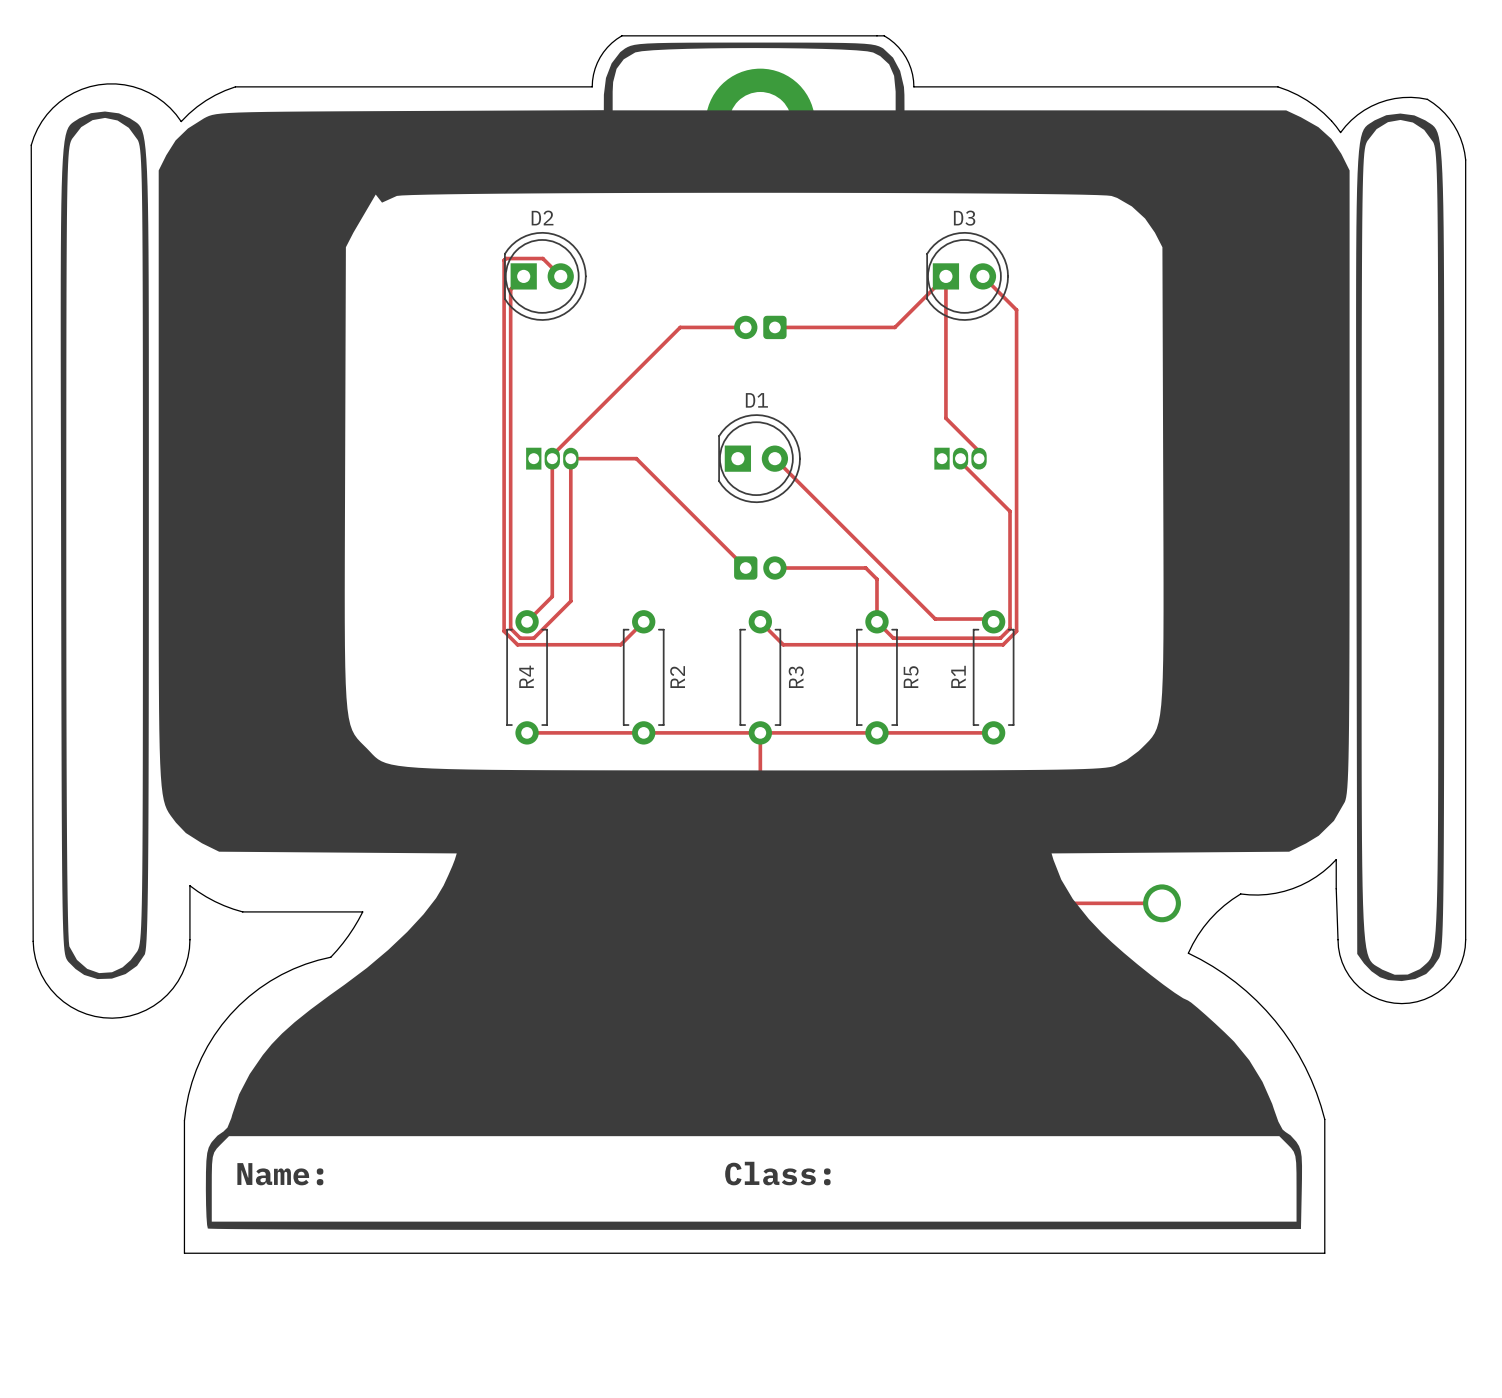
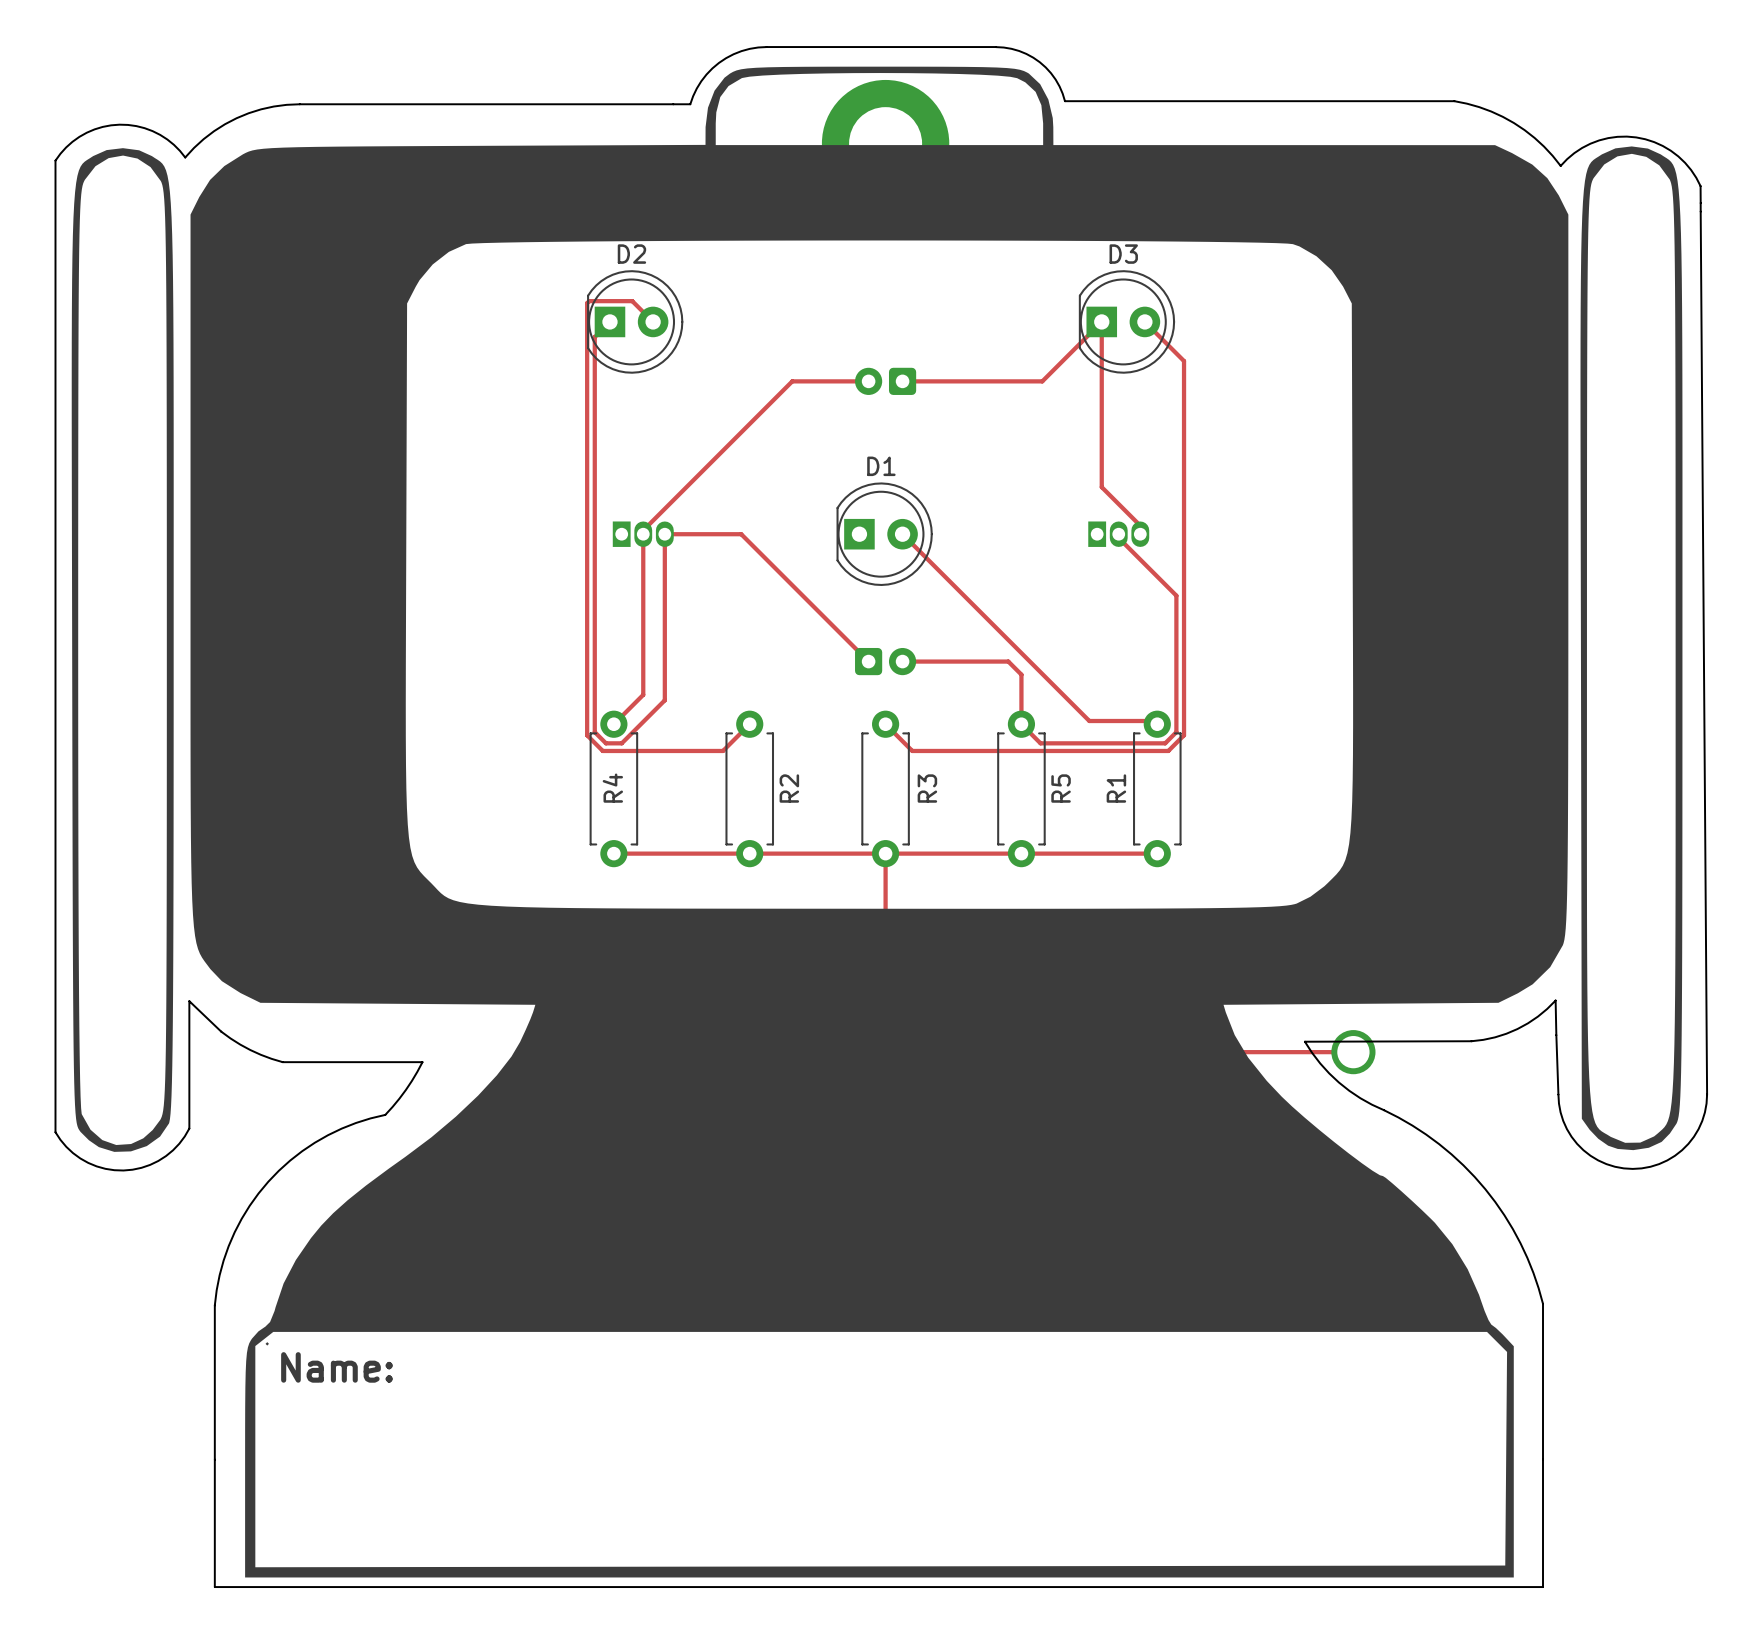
drawing: [60, 42, 1445, 1230] -> none
drawing: none -> [71, 66, 1683, 1578]
board edge: (235, 86) (205, 100) (181, 121) (163, 102) (141, 89) (115, 83) (90, 86) (73, 92) (52, 108) (41, 121) (31, 145) (33, 941) (35, 958) (45, 982) (56, 996) (70, 1006) (94, 1016) (112, 1018) (129, 1016) (153, 1005) (173, 988) (185, 965) (189, 939) (189, 885) -> (1064, 101) (1059, 86) (1045, 67) (1026, 53) (1011, 48) (995, 47) (766, 47) (741, 51) (718, 62) (701, 81) (690, 104) (286, 104) (248, 113) (225, 124) (203, 139) (185, 157) (173, 144) (160, 134) (144, 128) (128, 124) (111, 125) (94, 129) (79, 136) (66, 147) (55, 160) (55, 1132) (66, 1146) (80, 1158) (105, 1168) (132, 1169) (158, 1160) (173, 1150) (189, 1128) (189, 1001) (221, 1031)
board edge: (235, 86) (592, 86) (593, 74) (600, 57) (611, 43) (621, 35) (884, 35) (898, 47) (905, 57) (910, 68) (914, 86) -> none
board edge: (1248, 86) (1277, 86) (1297, 95) (1323, 113) (1340, 132) (1357, 114) (1379, 102) (1402, 97) (1427, 99) (1449, 118) (1462, 145) (1465, 159) (1465, 939) -> (1454, 101) (1479, 107) (1513, 123) (1534, 137) (1560, 165) (1574, 153) (1590, 143) (1608, 138) (1636, 137) (1662, 145) (1678, 156) (1691, 170) (1700, 186) (1707, 1094)
board edge: (1336, 888) (1336, 859) (1316, 876) (1292, 888) (1267, 894) (1240, 893) (1224, 905) (1209, 919) (1197, 935) (1188, 953) -> (1556, 1035) (1555, 1000) (1527, 1023) (1506, 1033) (1483, 1039) (1304, 1041) (1320, 1063) (1338, 1082) (1360, 1098) (1384, 1110)
text: Class: (777, 1173) -> none
board edge: (184, 1253) (1324, 1253) -> (214, 1459) (214, 1587) (1543, 1587) (1543, 1459)

